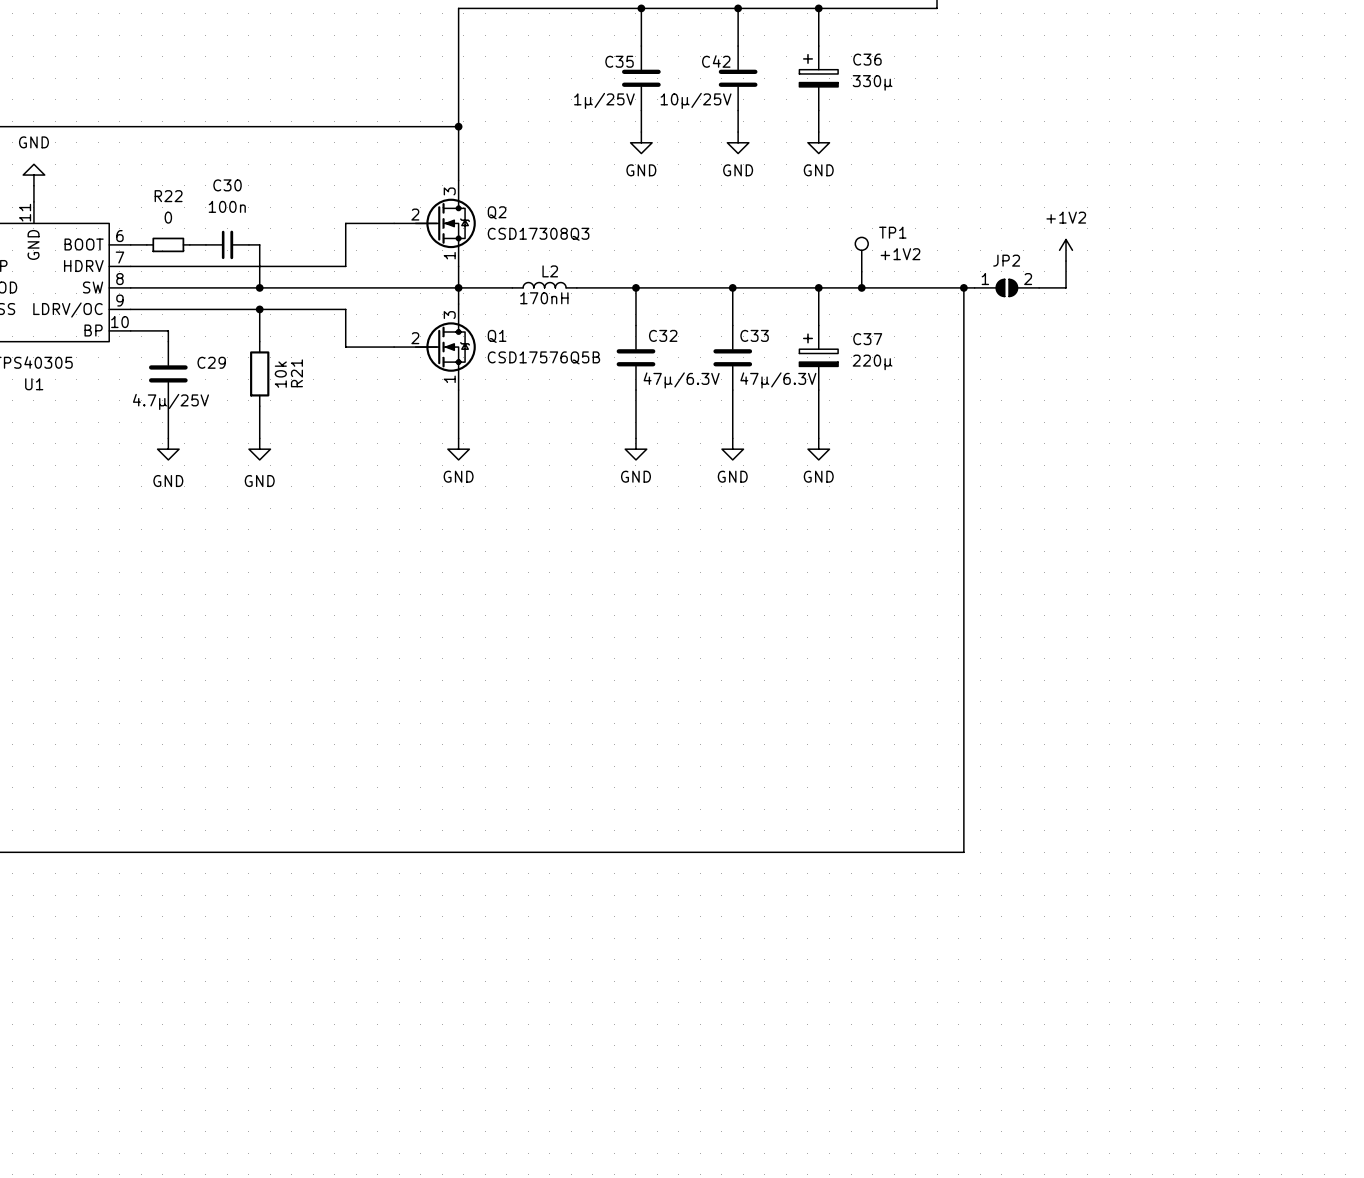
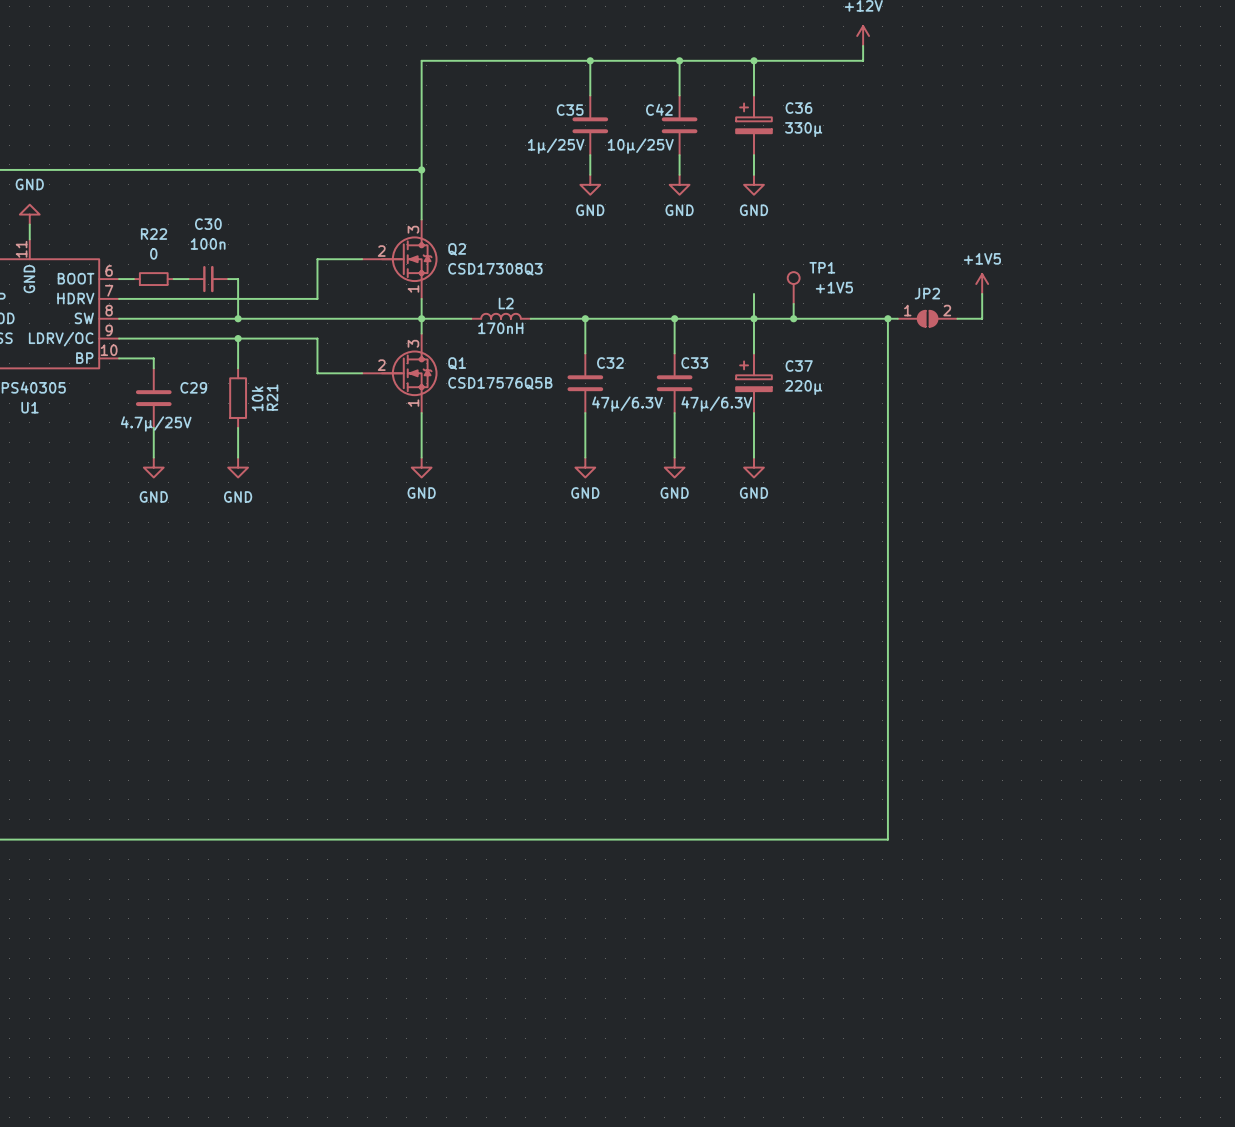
power symbol: +1V2 (1066, 250) -> +1V5 (982, 284)
TP1 value: +1V2 (900, 254) -> +1V5 (834, 287)
wire: none -> (753, 293) (753, 318)

